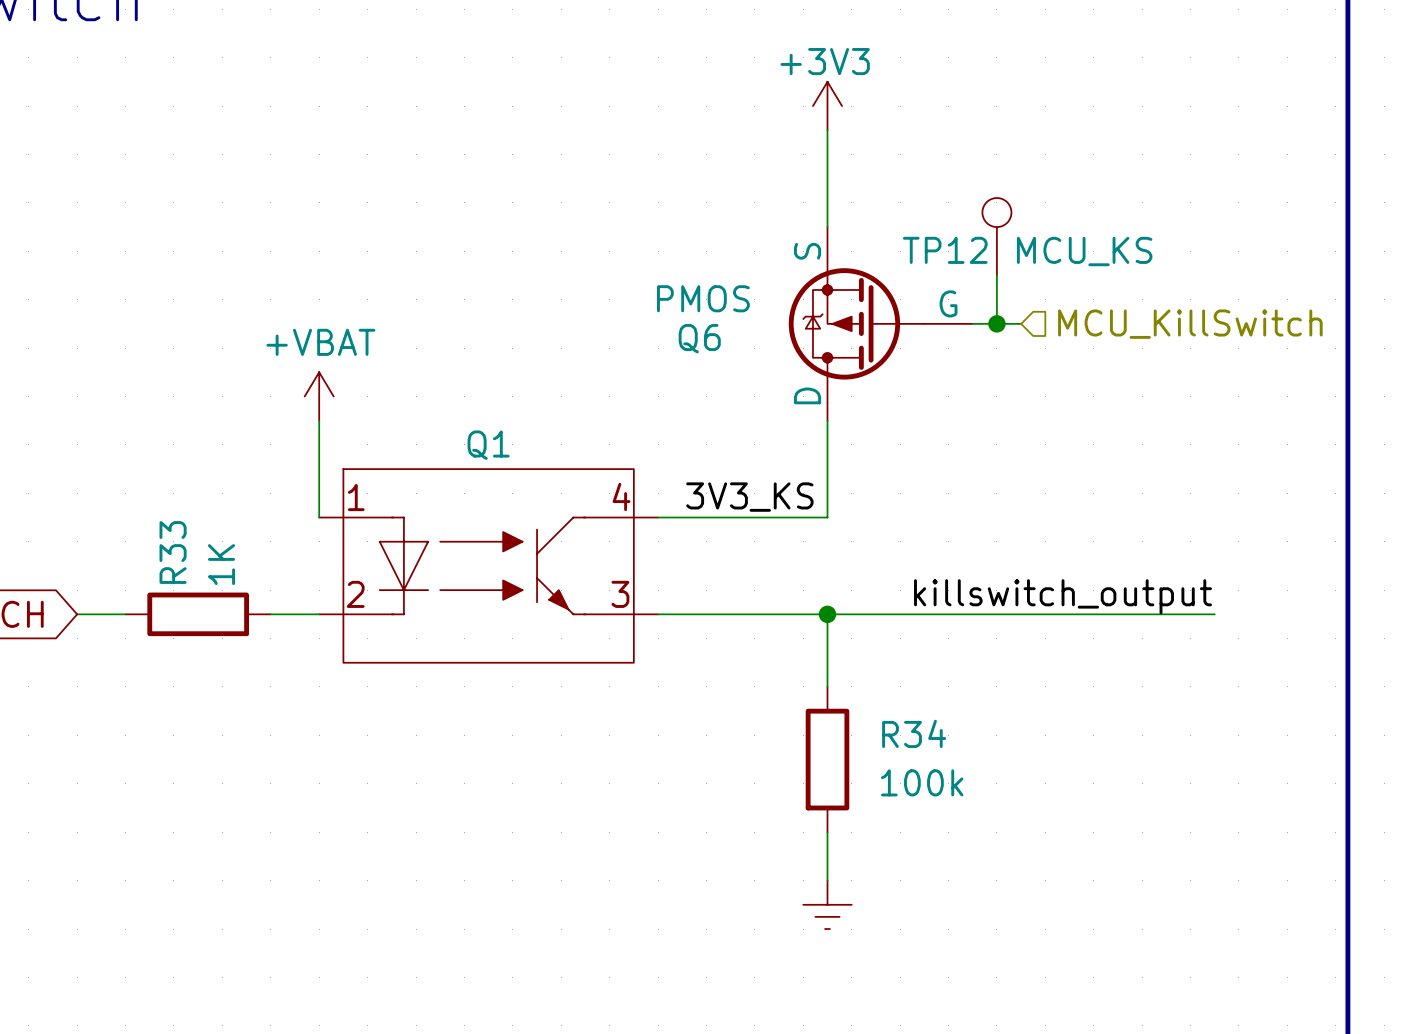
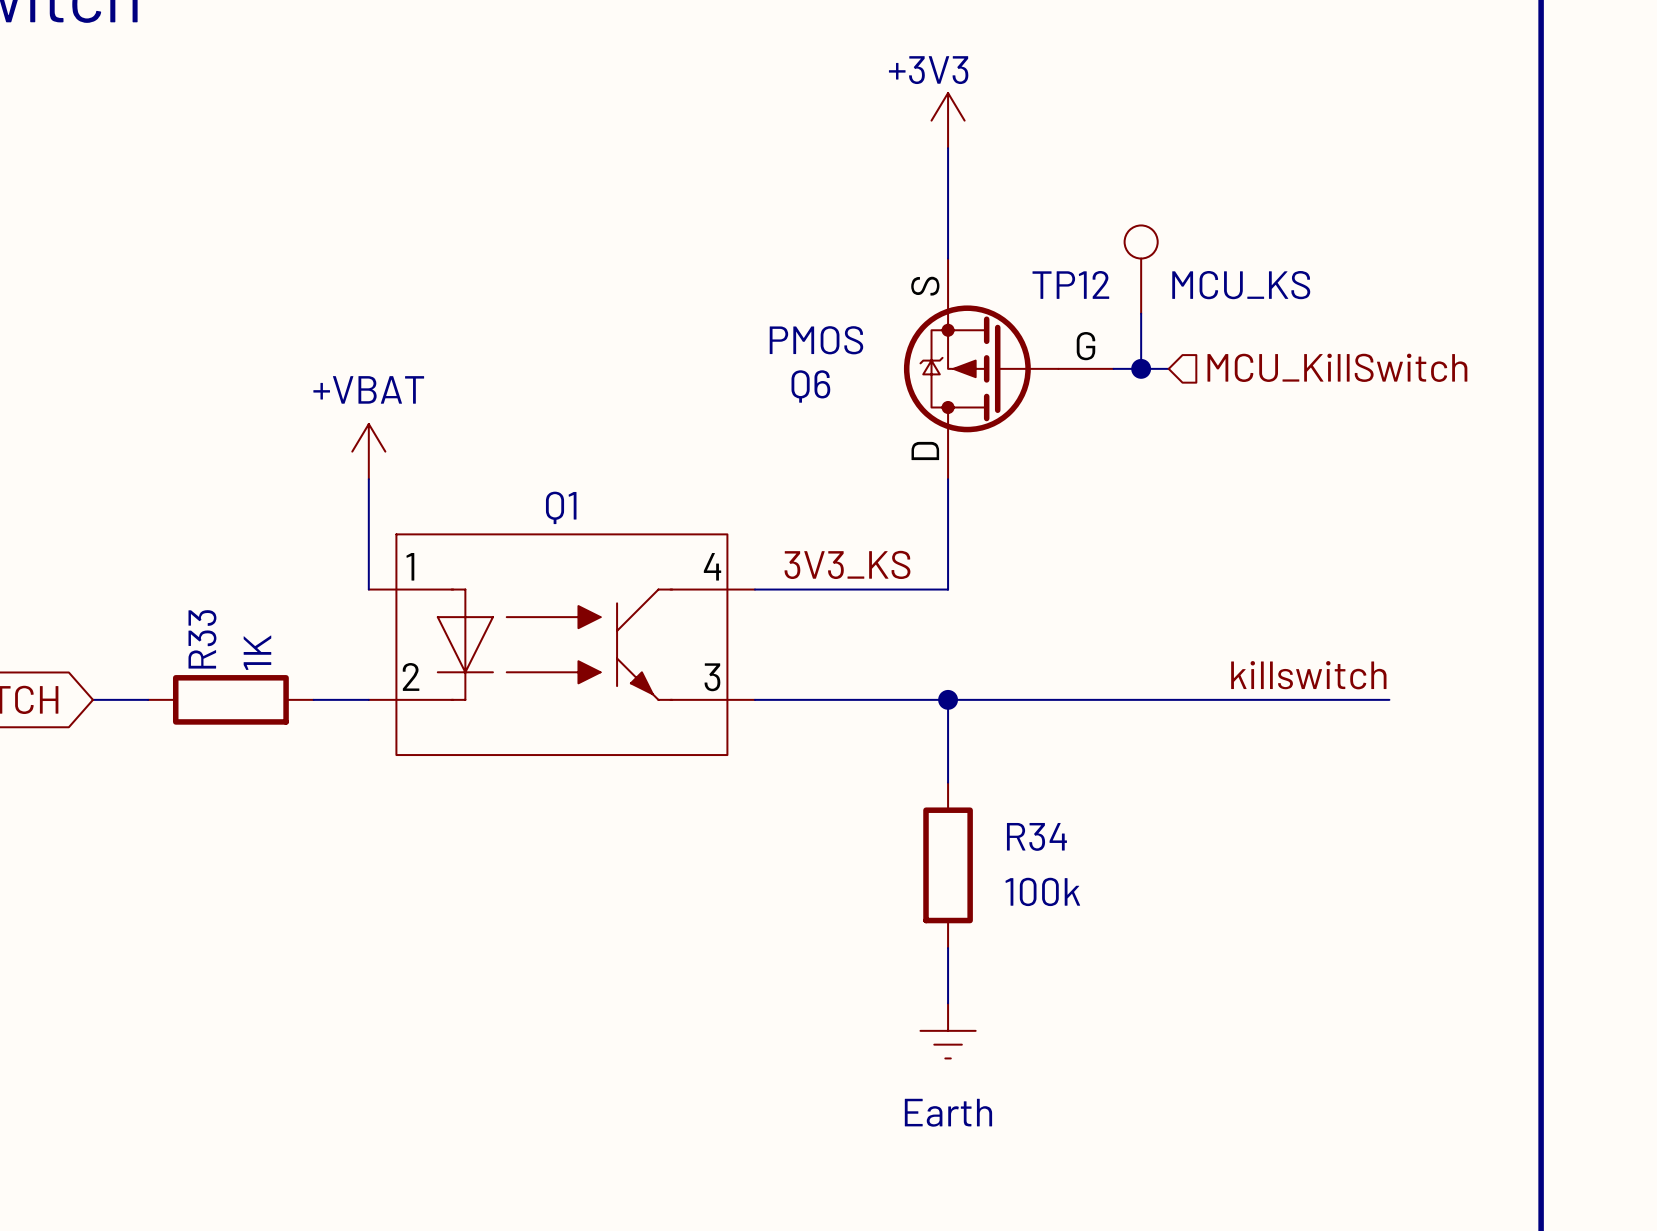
label: killswitch_output (1063, 596) -> killswitch (1308, 675)
power symbol text: none -> Earth (948, 1112)

